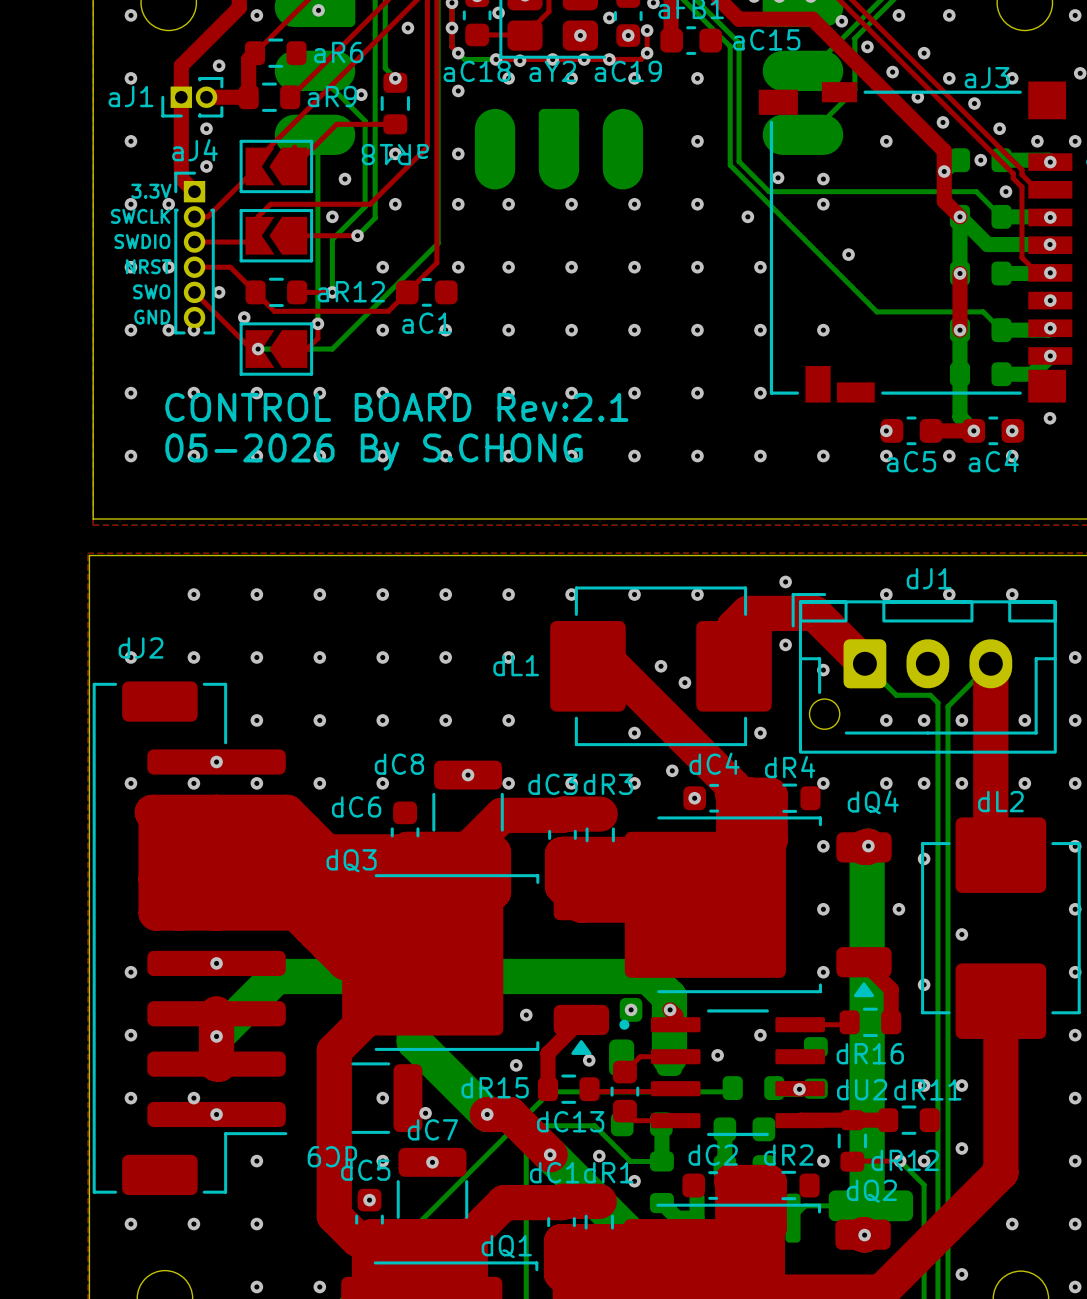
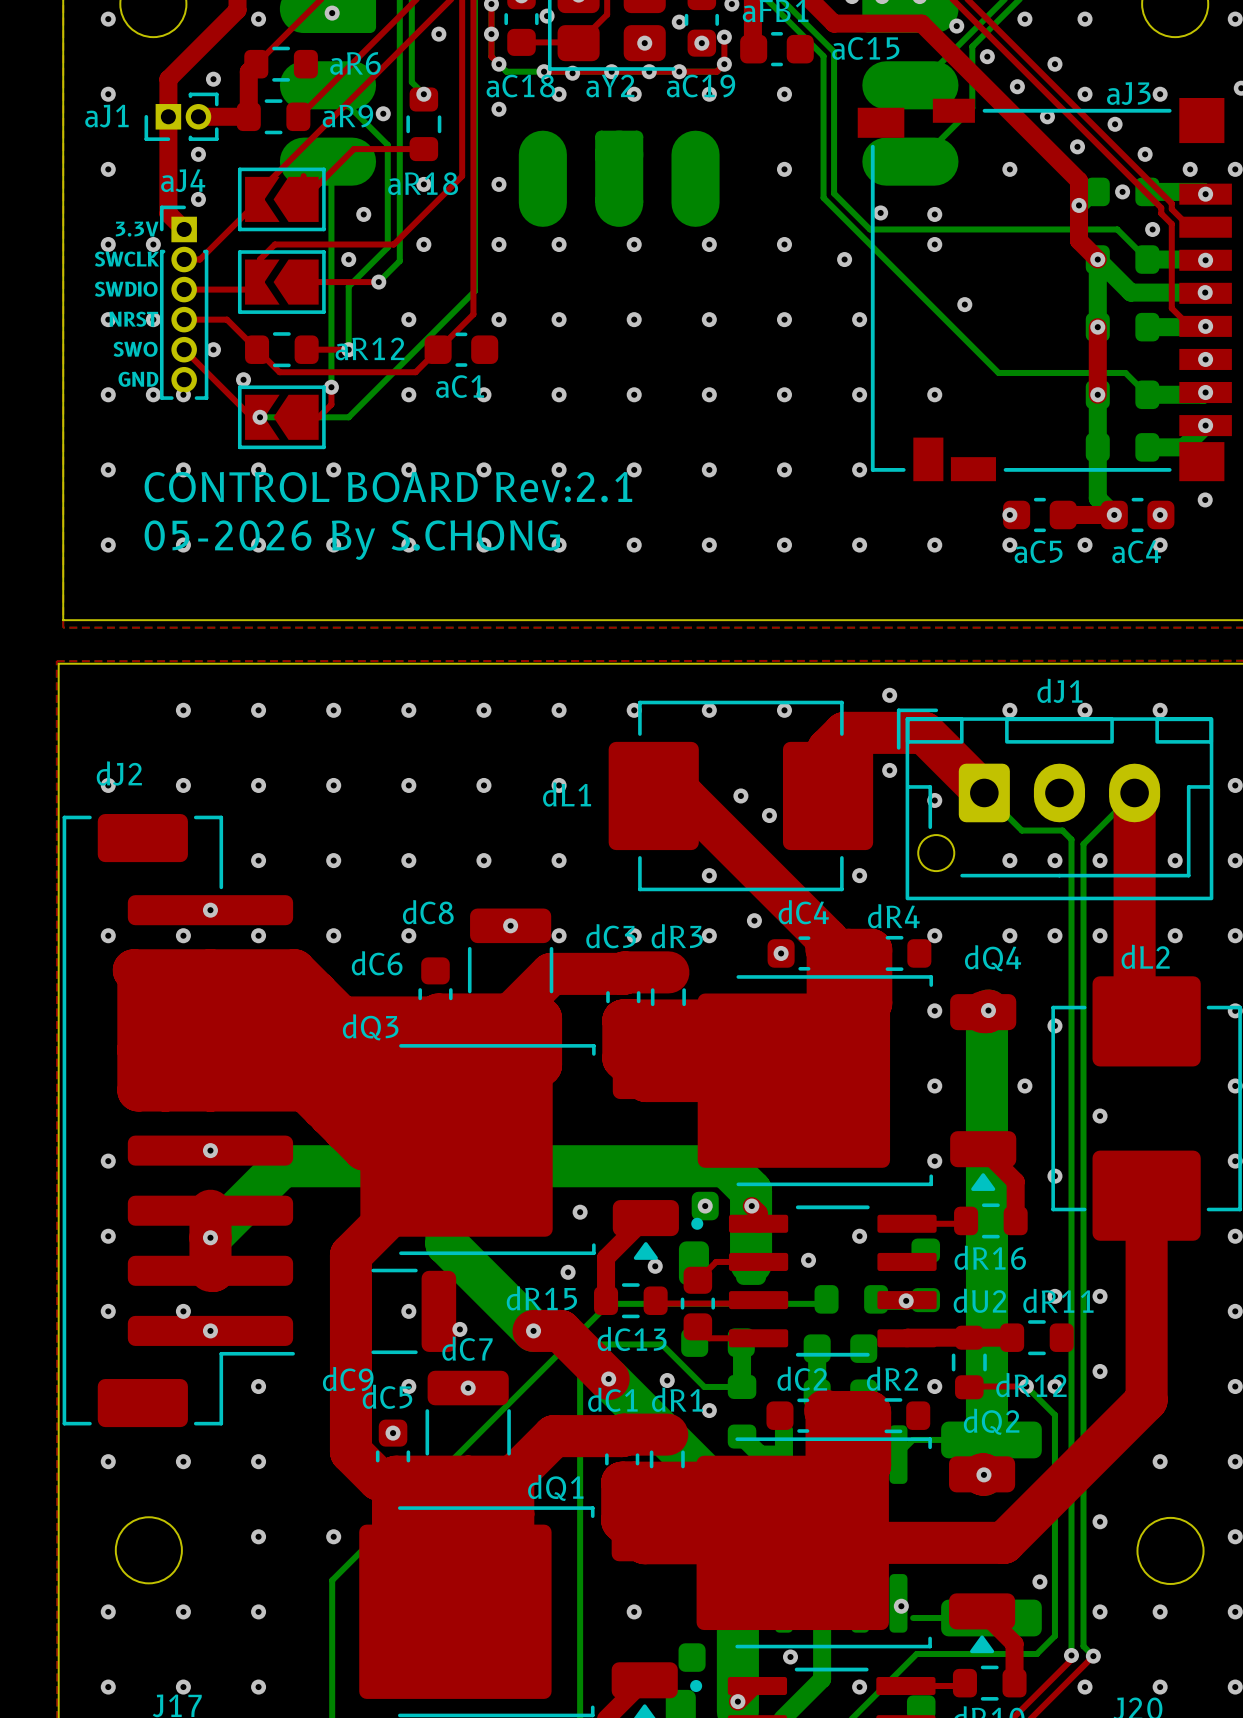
aR18 name rotation: 0° (395, 154) -> 180° (423, 183)
dC9 name rotation: 0° (332, 1156) -> 180° (348, 1379)

